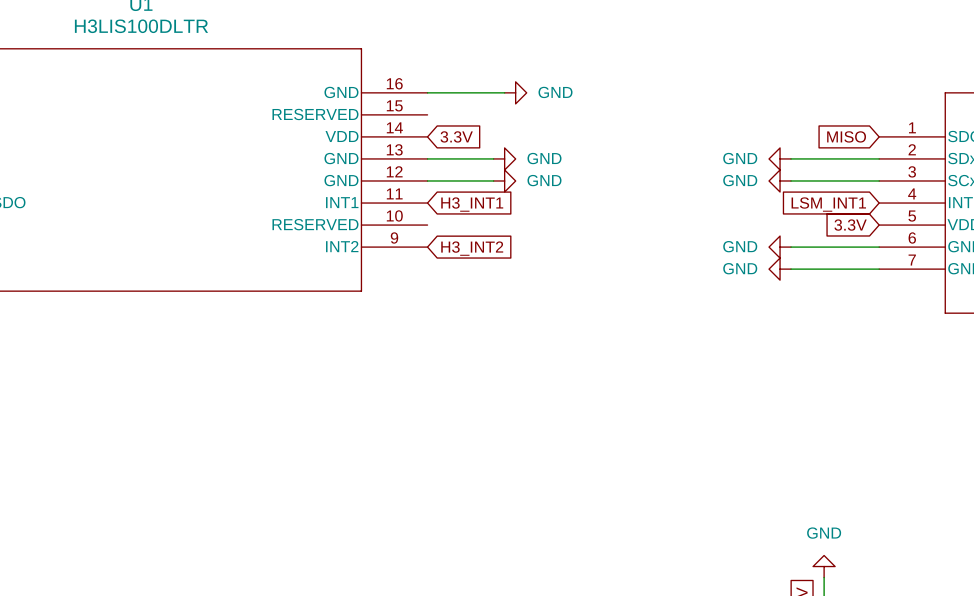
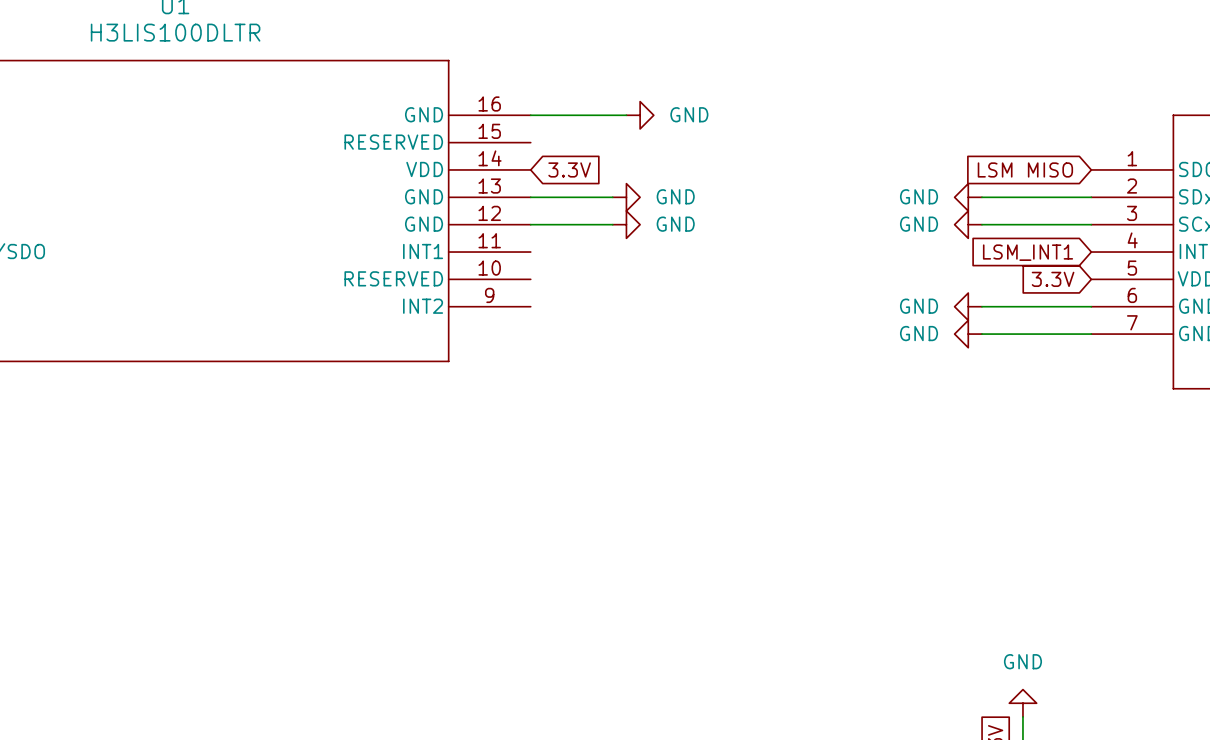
global label: MISO (846, 136) -> LSM MISO (1025, 169)
global label: H3_INT1 (472, 204) -> none
global label: H3_INT2 (472, 248) -> none

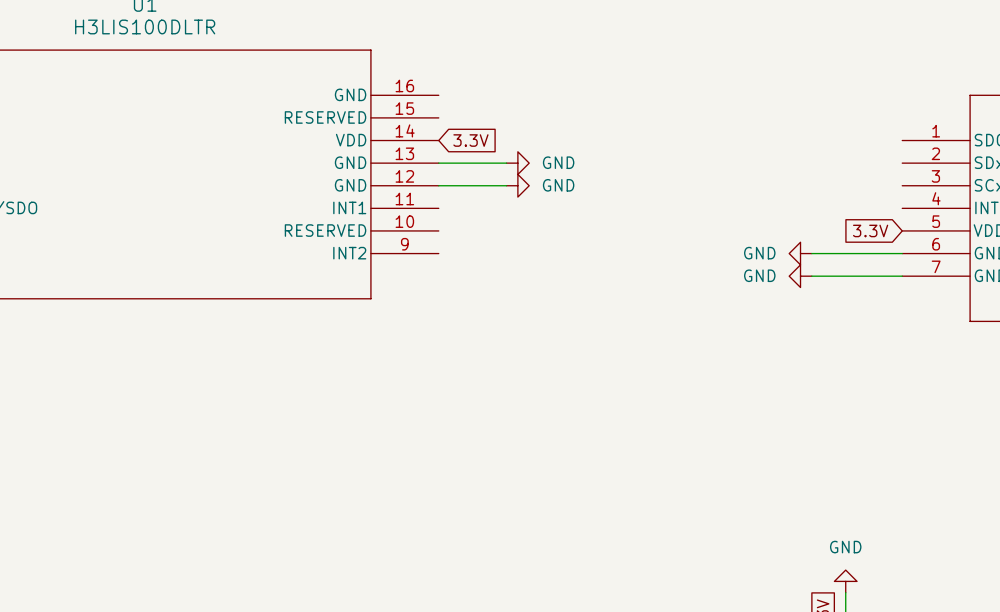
wire: (530, 115) (626, 115) -> none
power symbol: GND (640, 115) -> none
global label: LSM MISO (1025, 169) -> none
power symbol: GND (968, 197) -> none
wire: (981, 197) (1091, 197) -> none
power symbol: GND (968, 224) -> none
wire: (981, 224) (1091, 224) -> none
global label: LSM_INT1 (1028, 252) -> none

